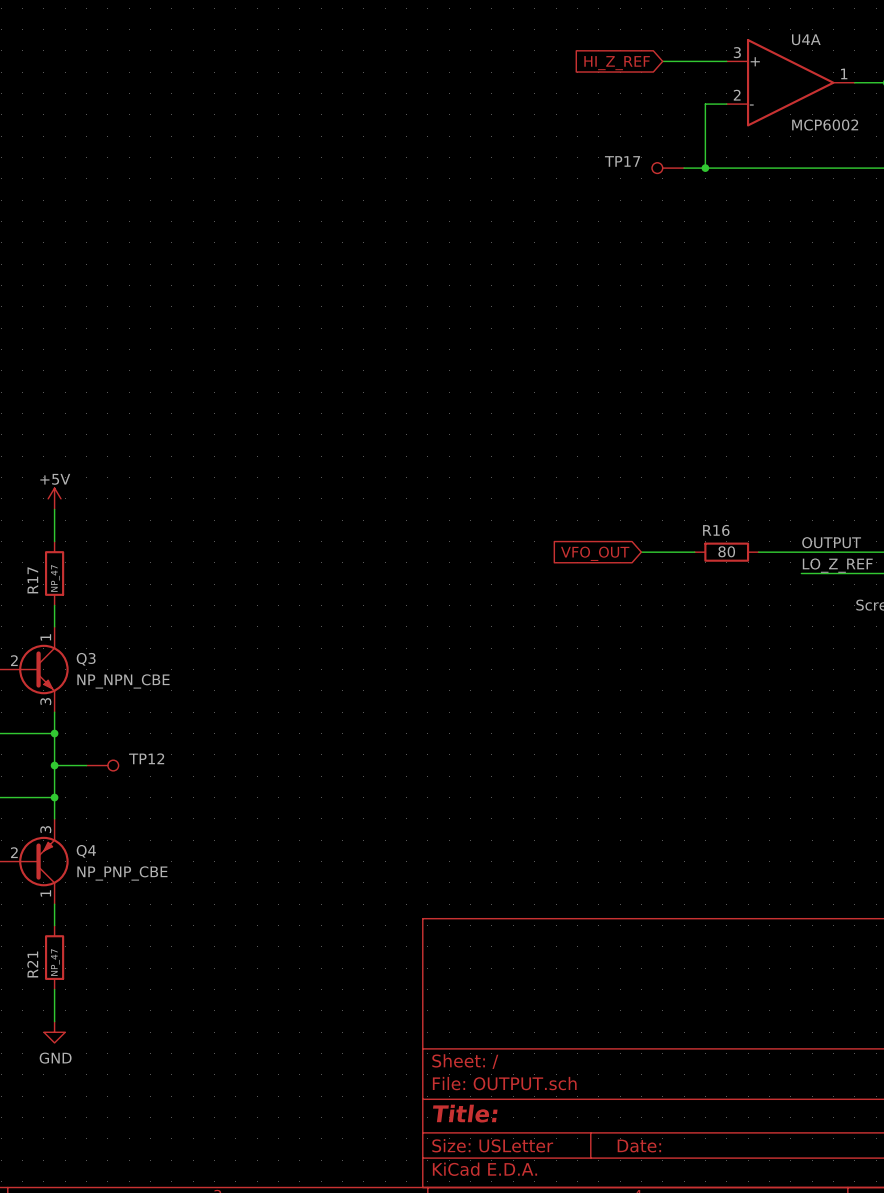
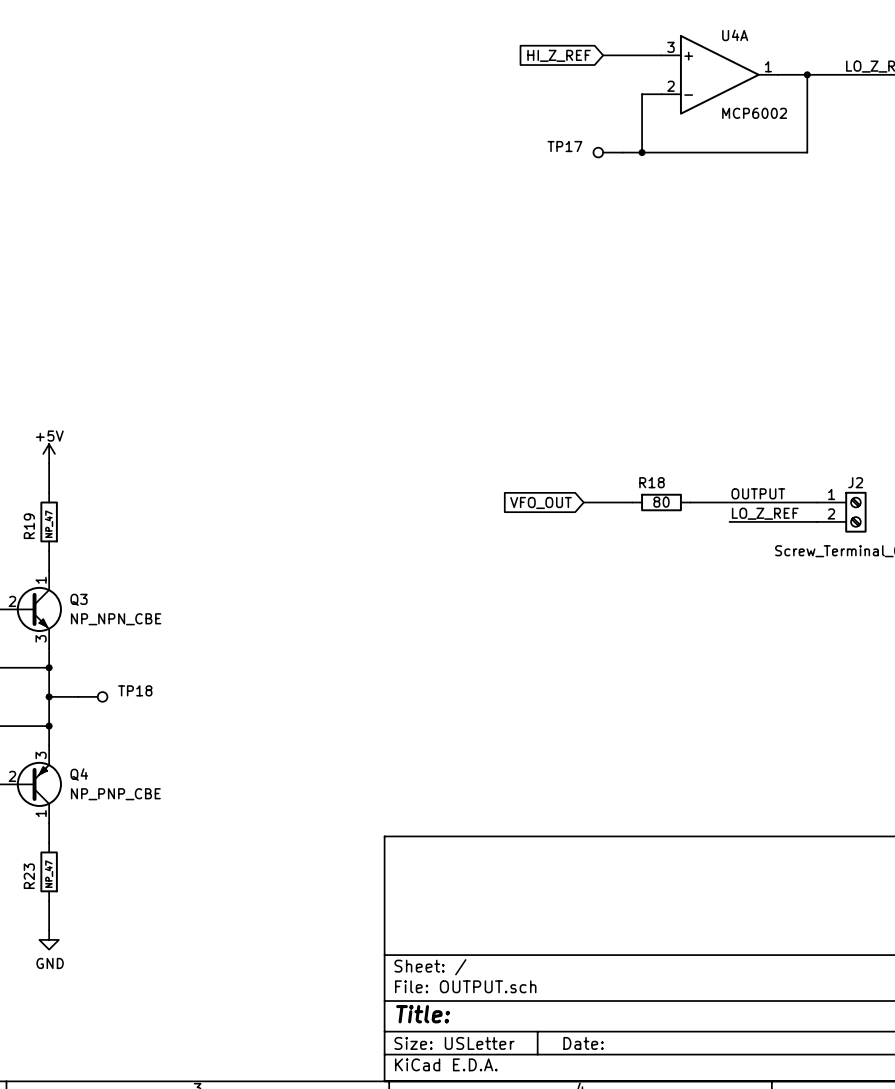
R16 name: R16 (716, 530) -> R18 (652, 482)
R17 name: R17 (32, 580) -> R19 (29, 526)
TP12 name: TP12 (146, 758) -> TP18 (135, 690)
R21 name: R21 (32, 964) -> R23 (29, 876)

